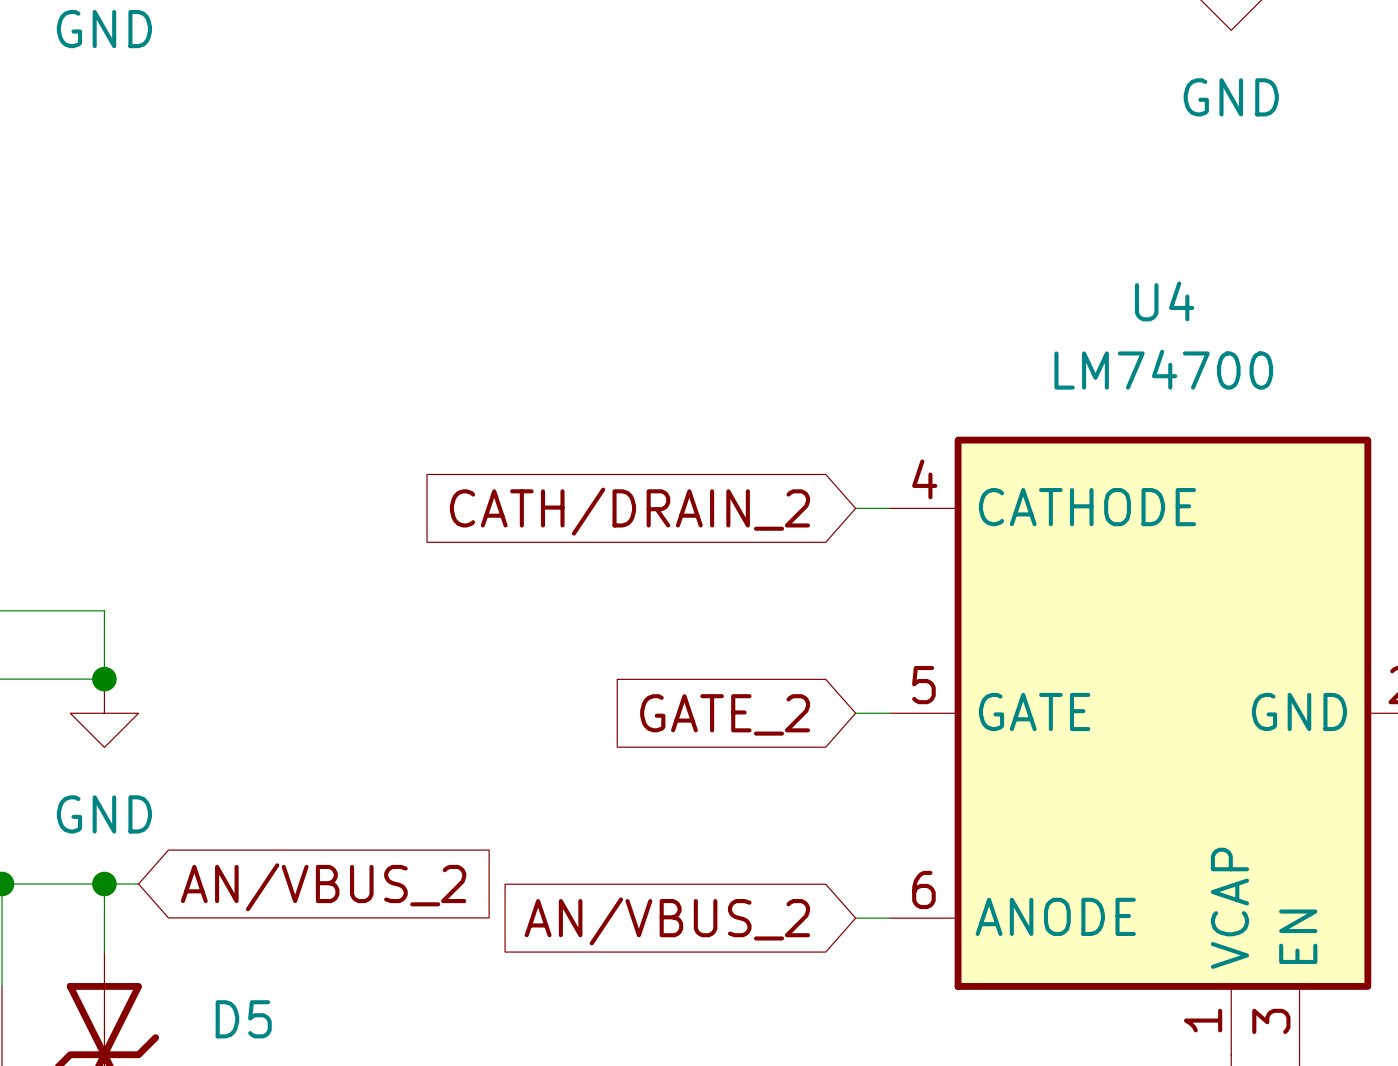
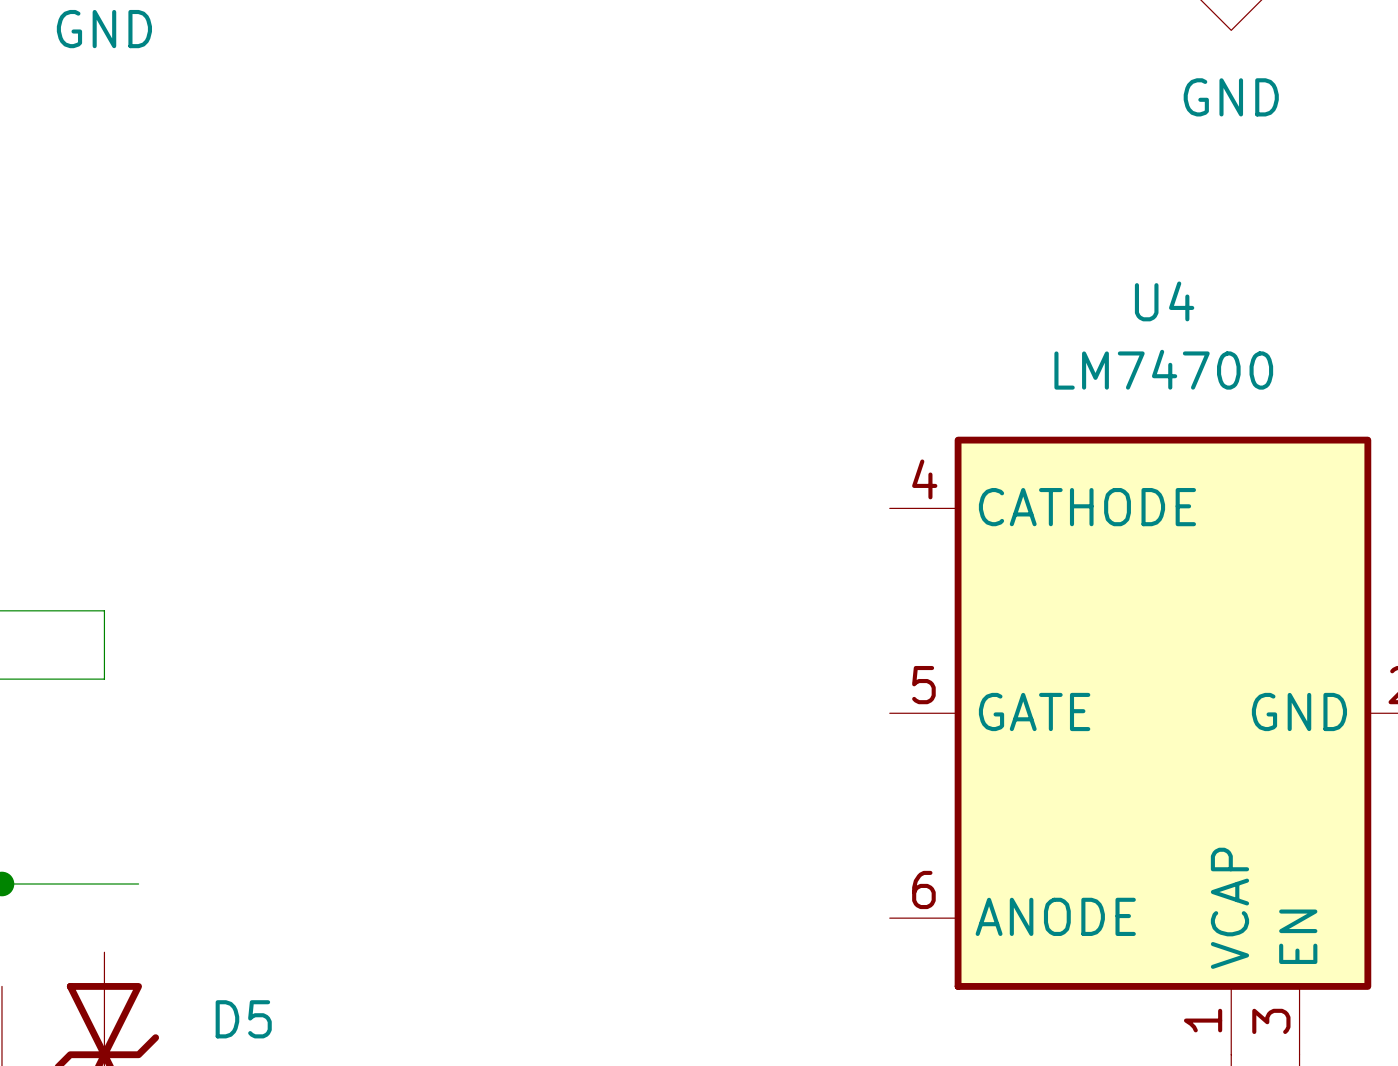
wire: (855, 508) (889, 508) -> none
global label: CATH/DRAIN_2 (629, 511) -> none
junction: (104, 679) -> none
power symbol: GND (104, 713) -> none
wire: (855, 713) (889, 713) -> none
global label: GATE_2 (725, 714) -> none
wire: (1, 884) (1, 986) -> none
wire: (104, 884) (104, 952) -> none
junction: (104, 884) -> none
global label: AN/VBUS_2 (323, 887) -> none
wire: (855, 918) (889, 918) -> none
global label: AN/VBUS_2 (667, 921) -> none

